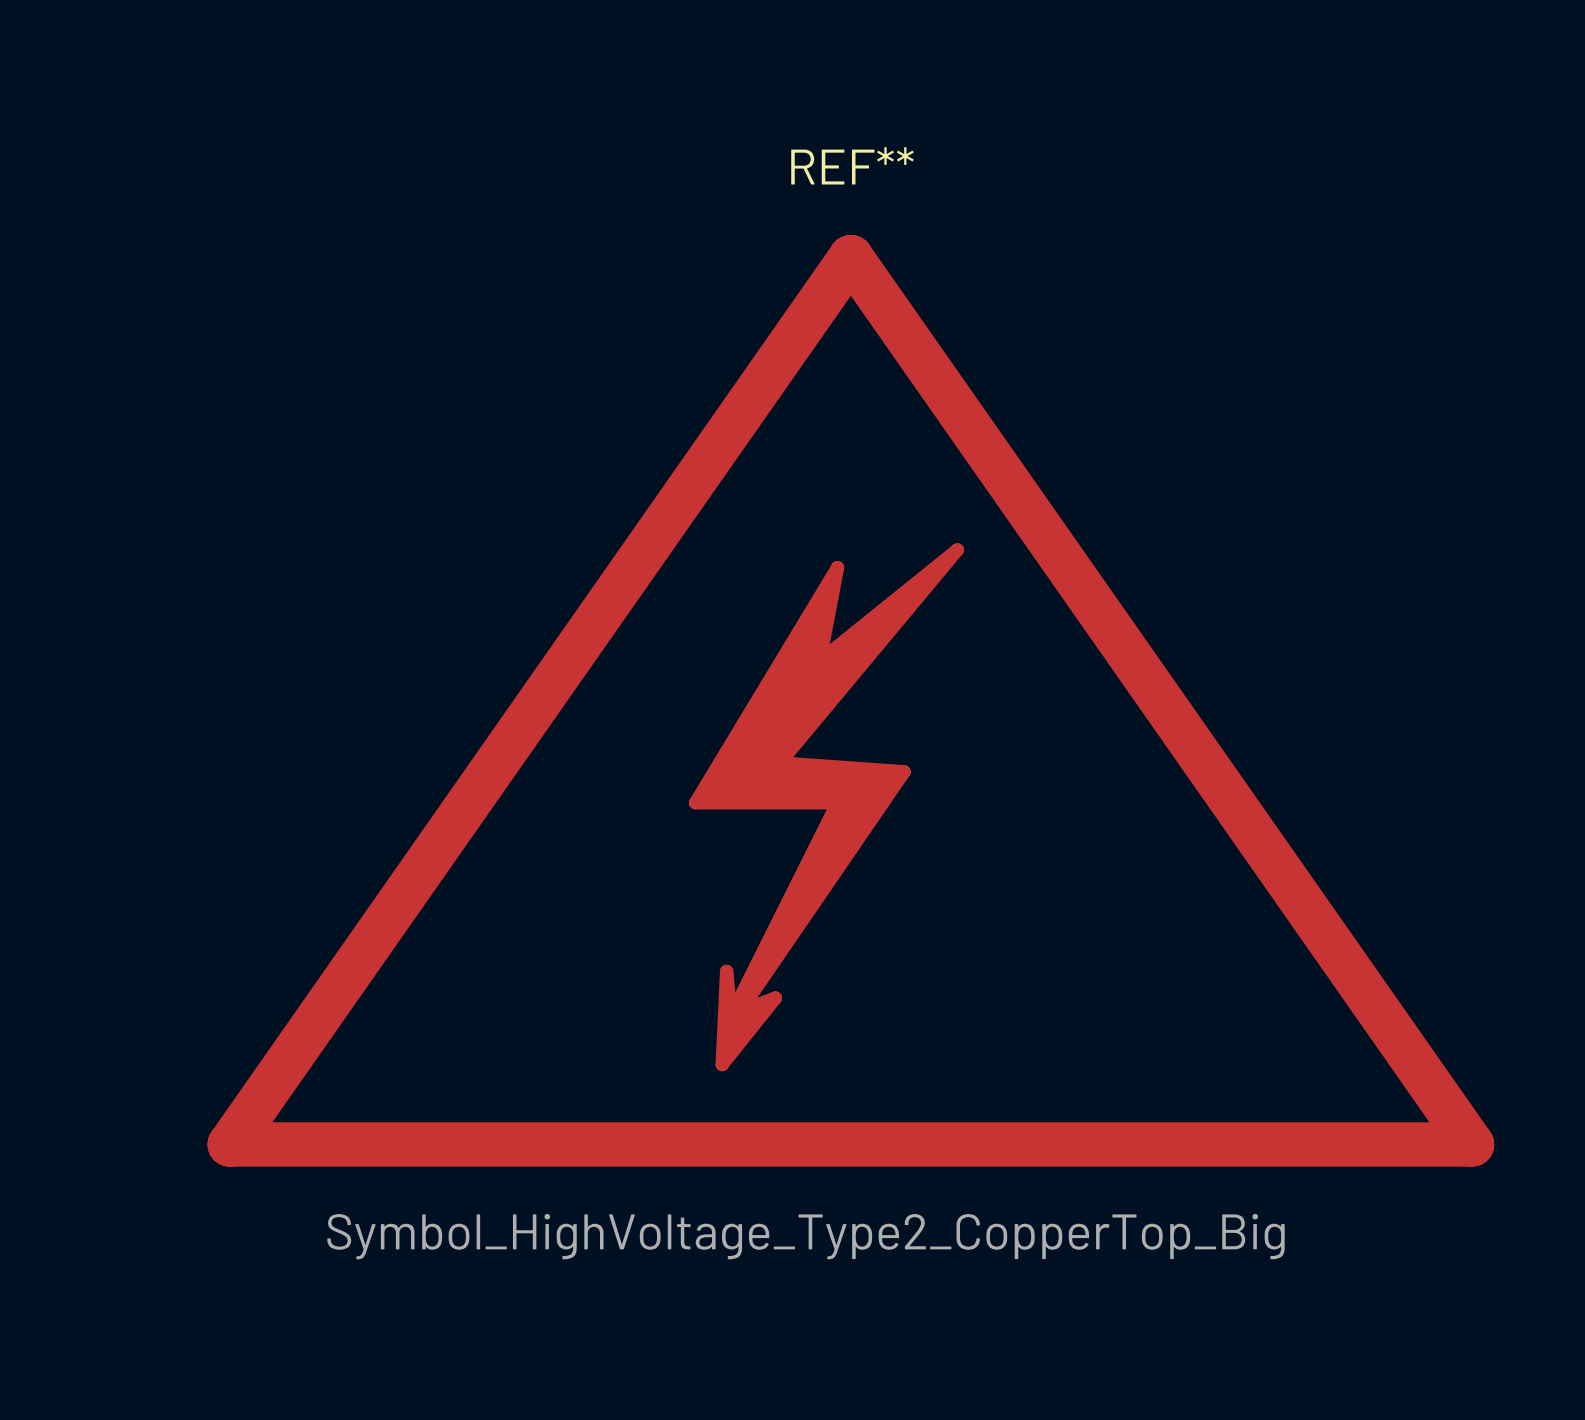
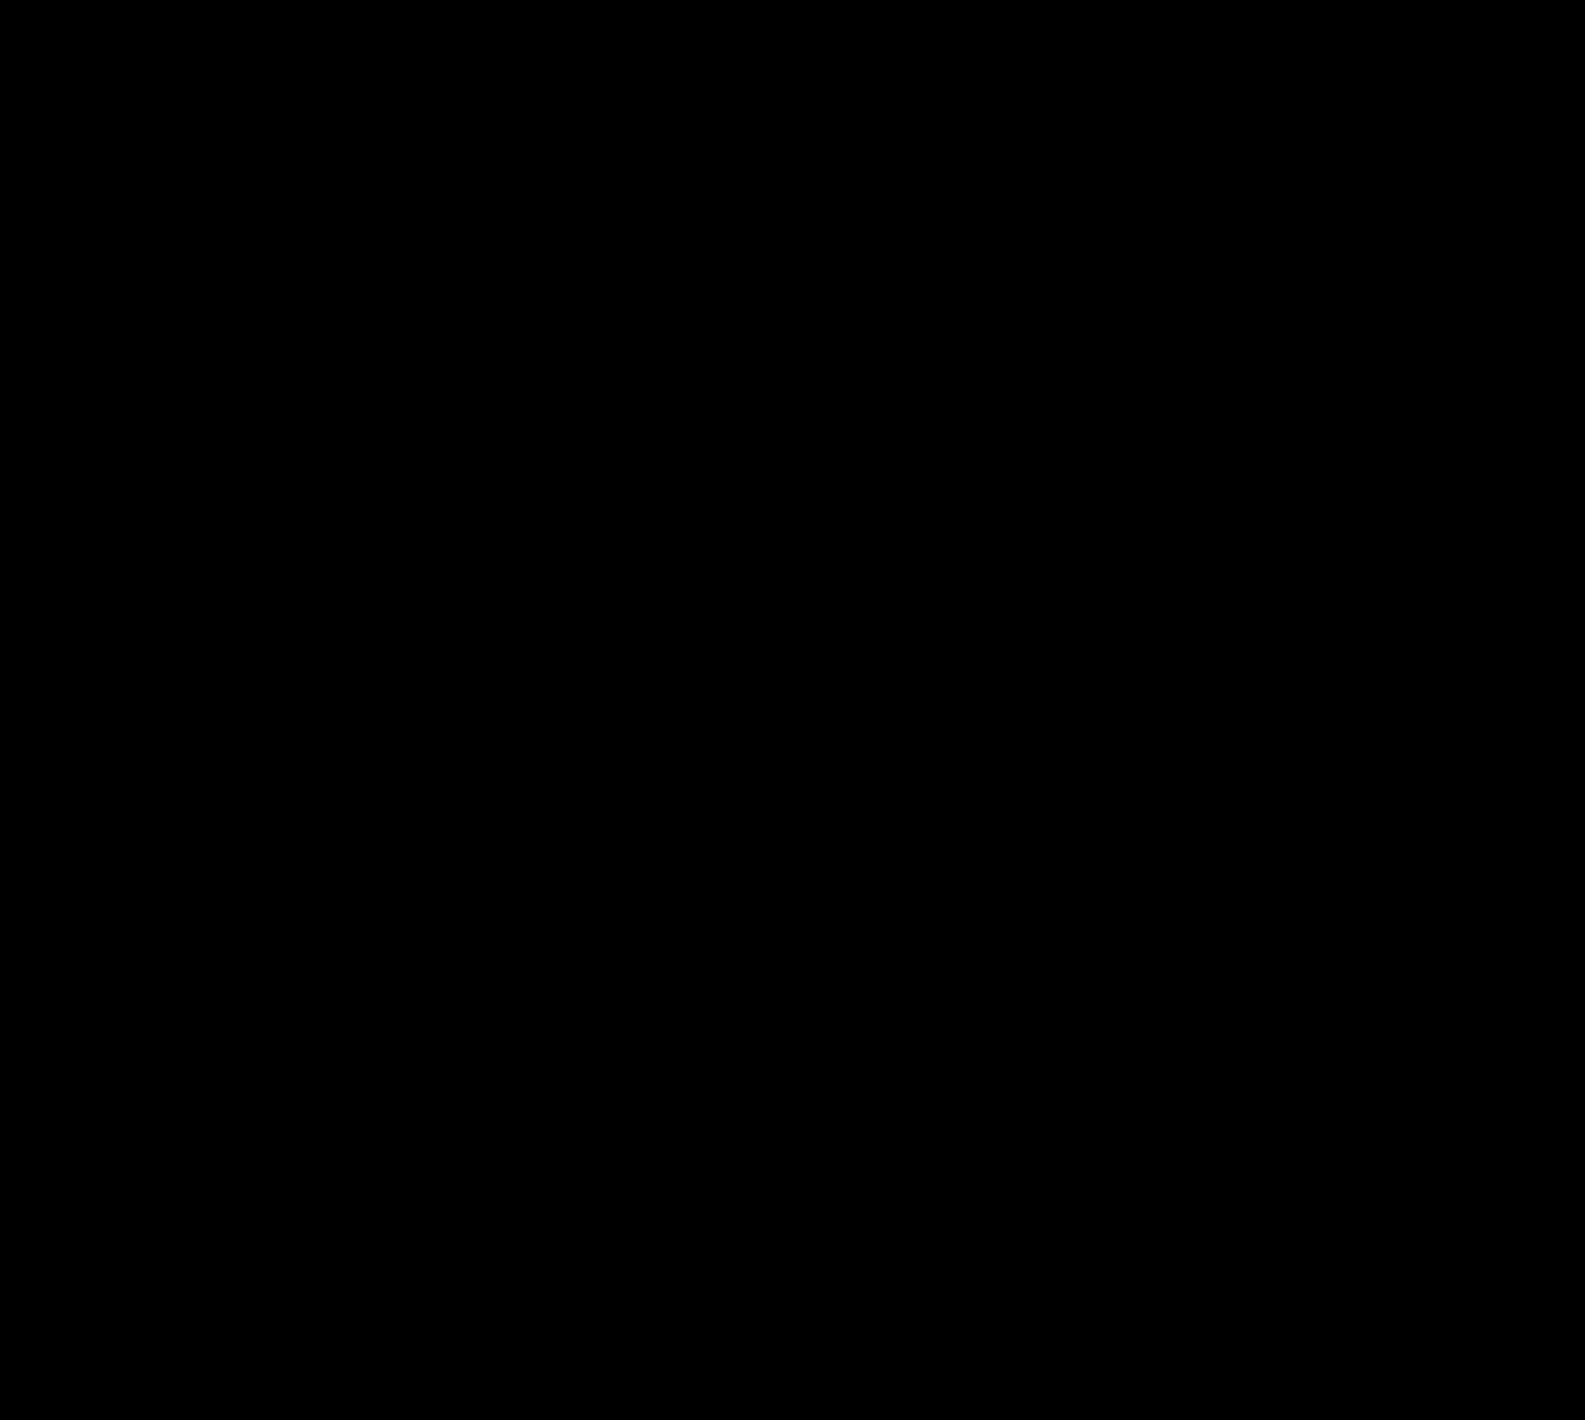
REF**: Symbol_HighVoltage_Type2_CopperTop_Big (850, 700) -> none

